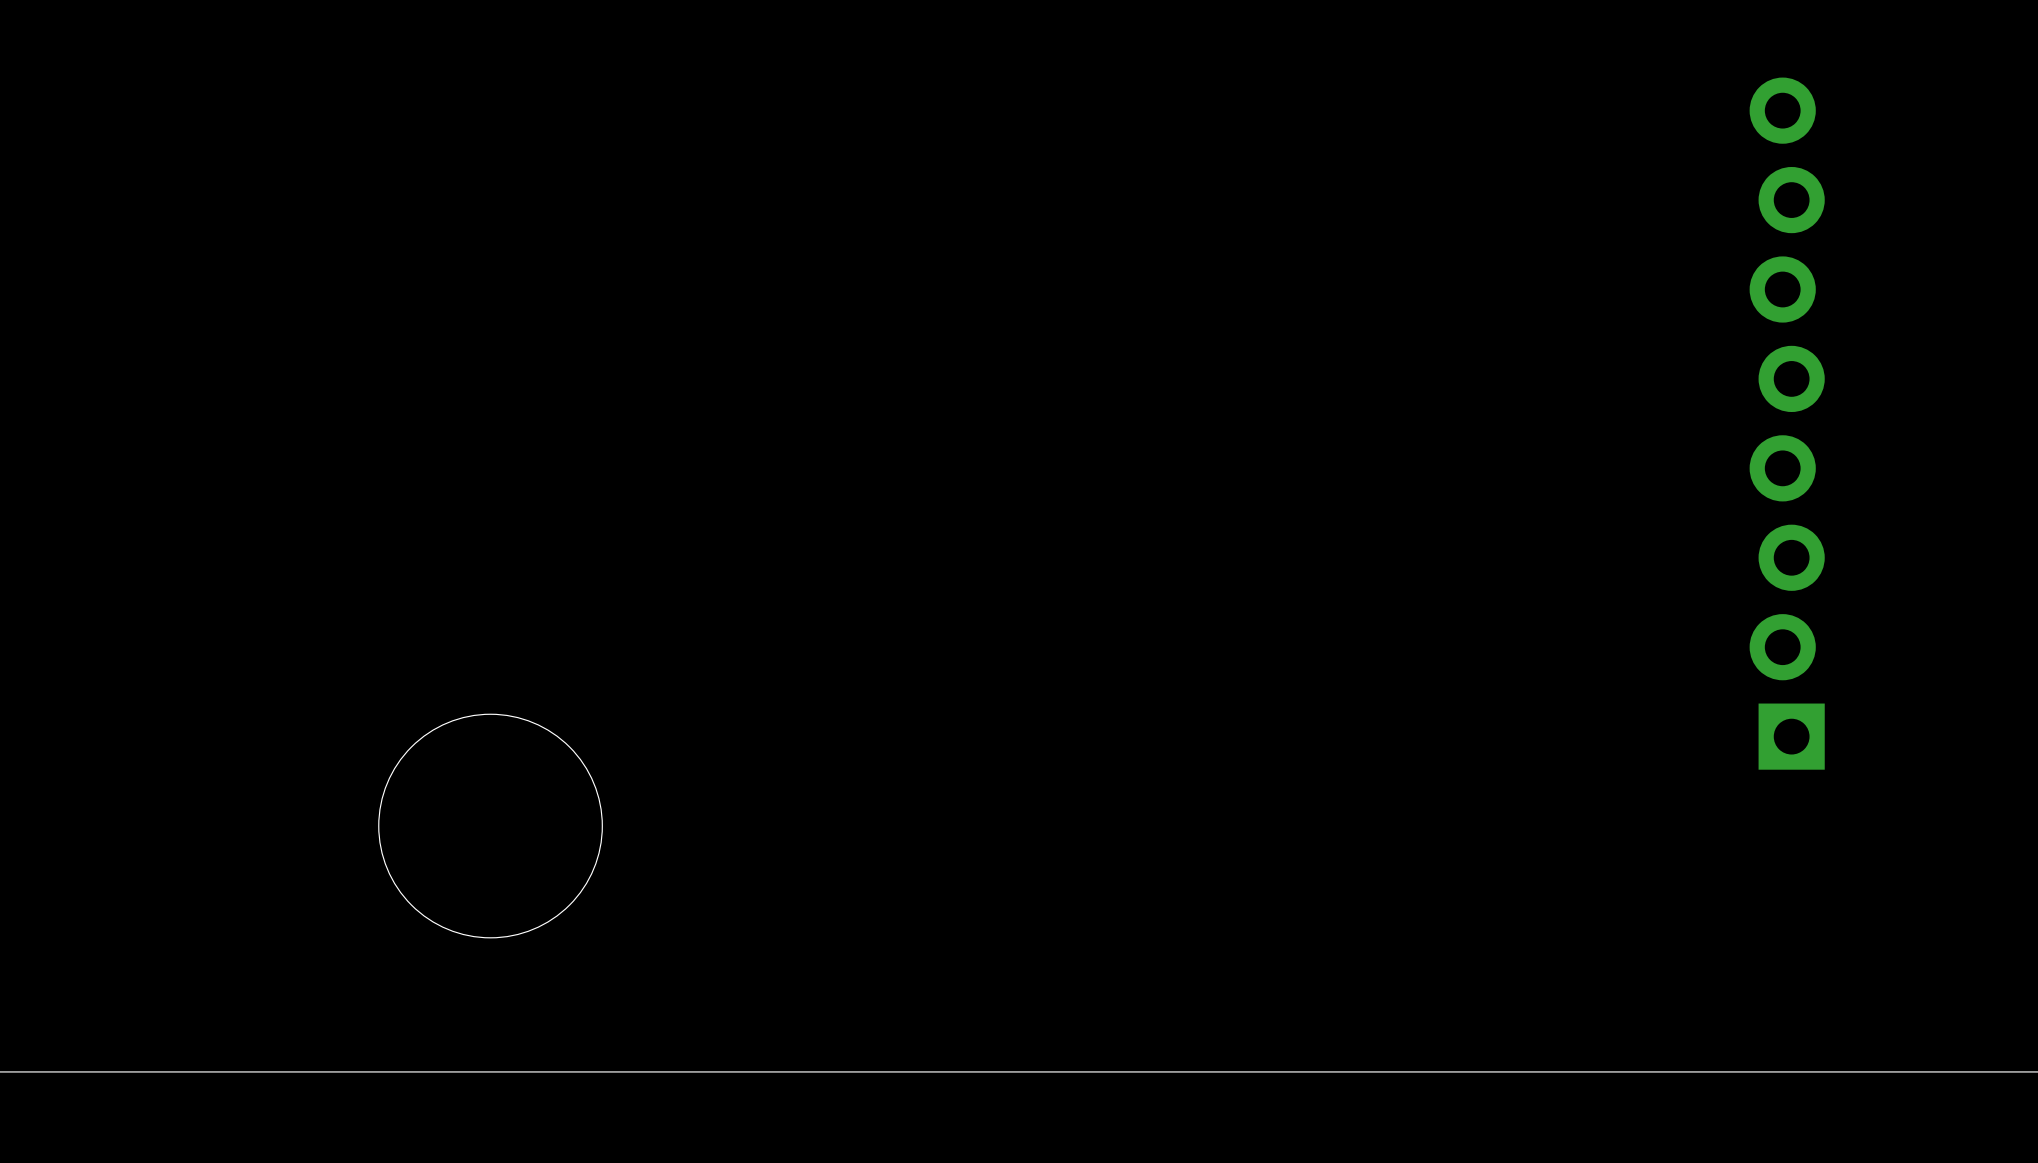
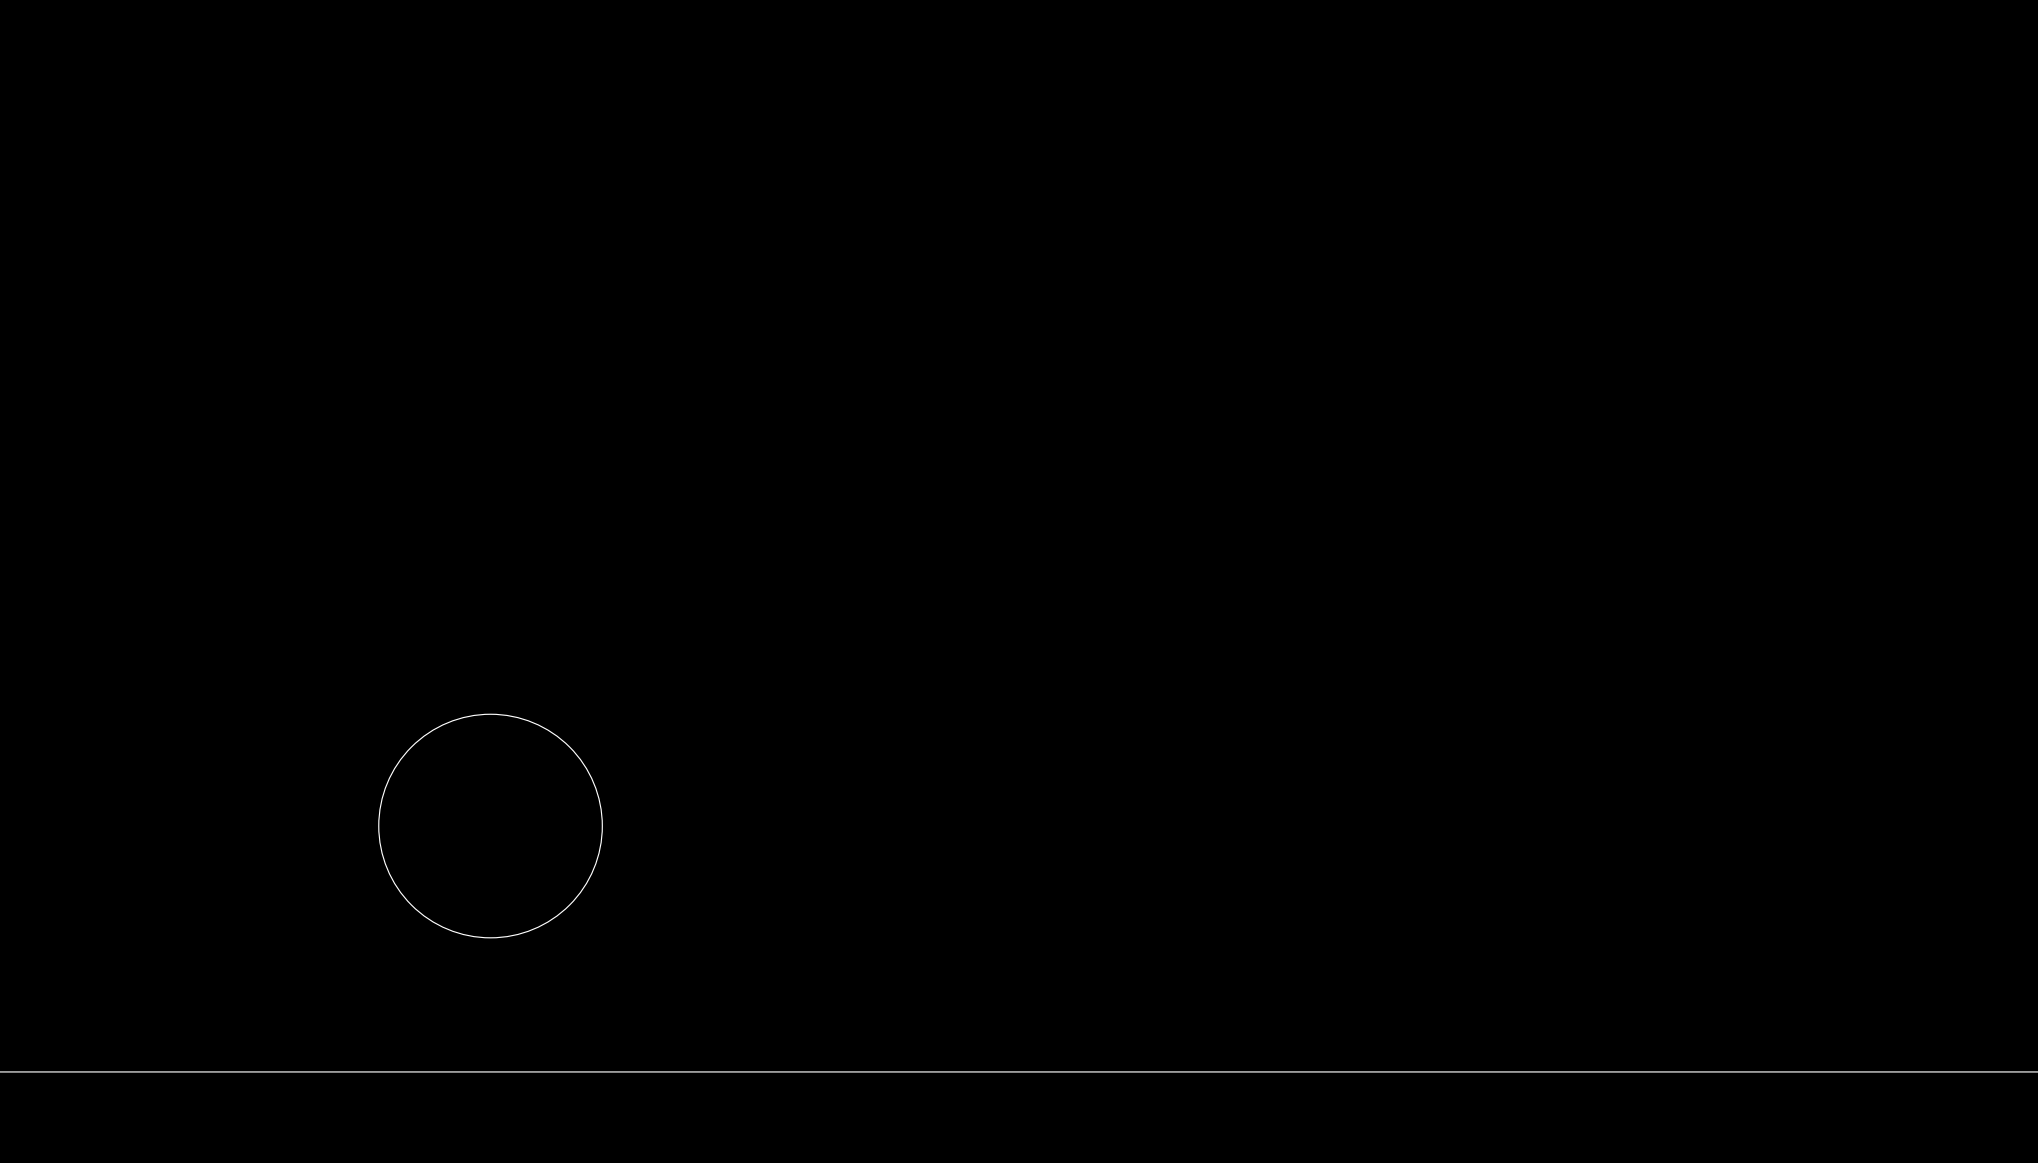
part: (1787, 423) -> none

